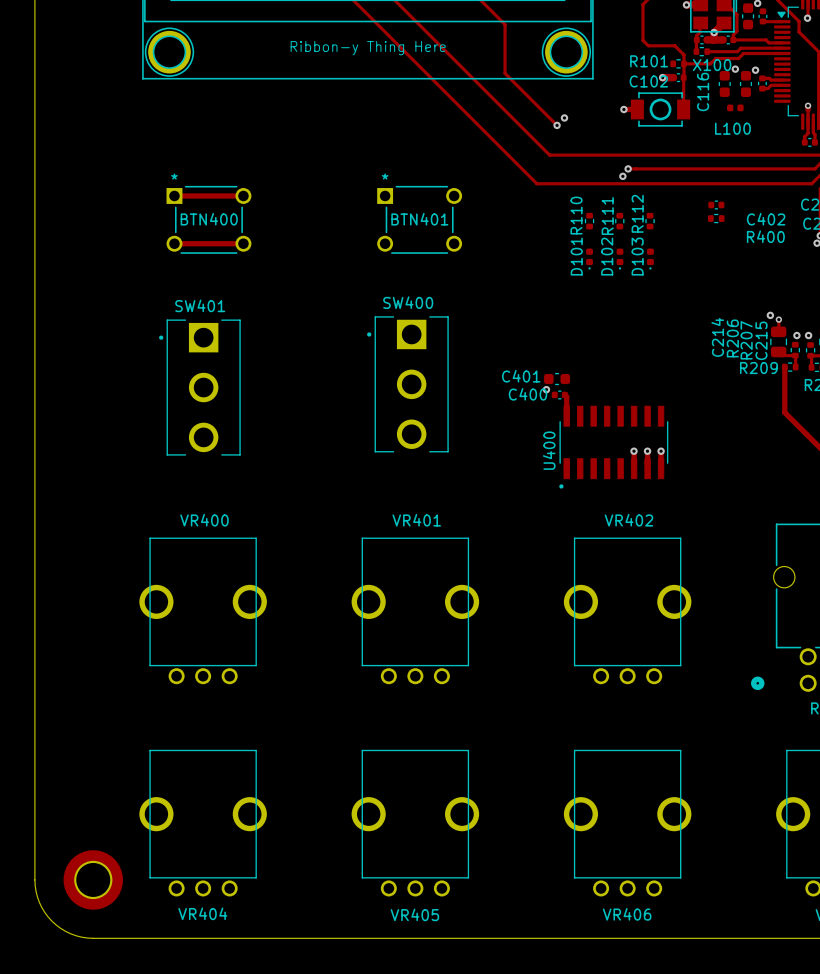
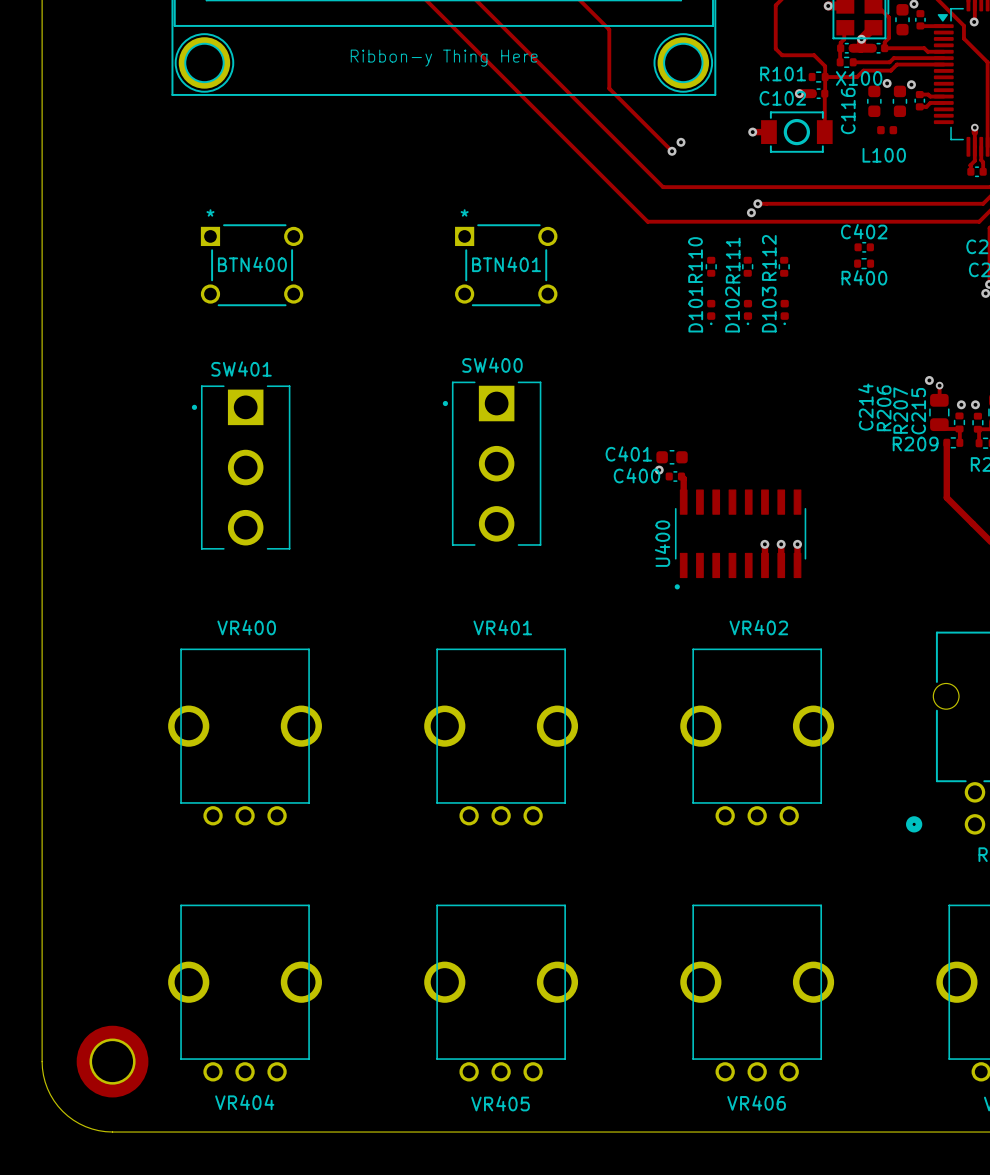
track: (174, 195) (243, 195) -> none
C402 name position: C402 (766, 219) -> C402 (864, 231)
R400 name position: R400 (765, 236) -> R400 (864, 277)
track: (174, 243) (243, 243) -> none

